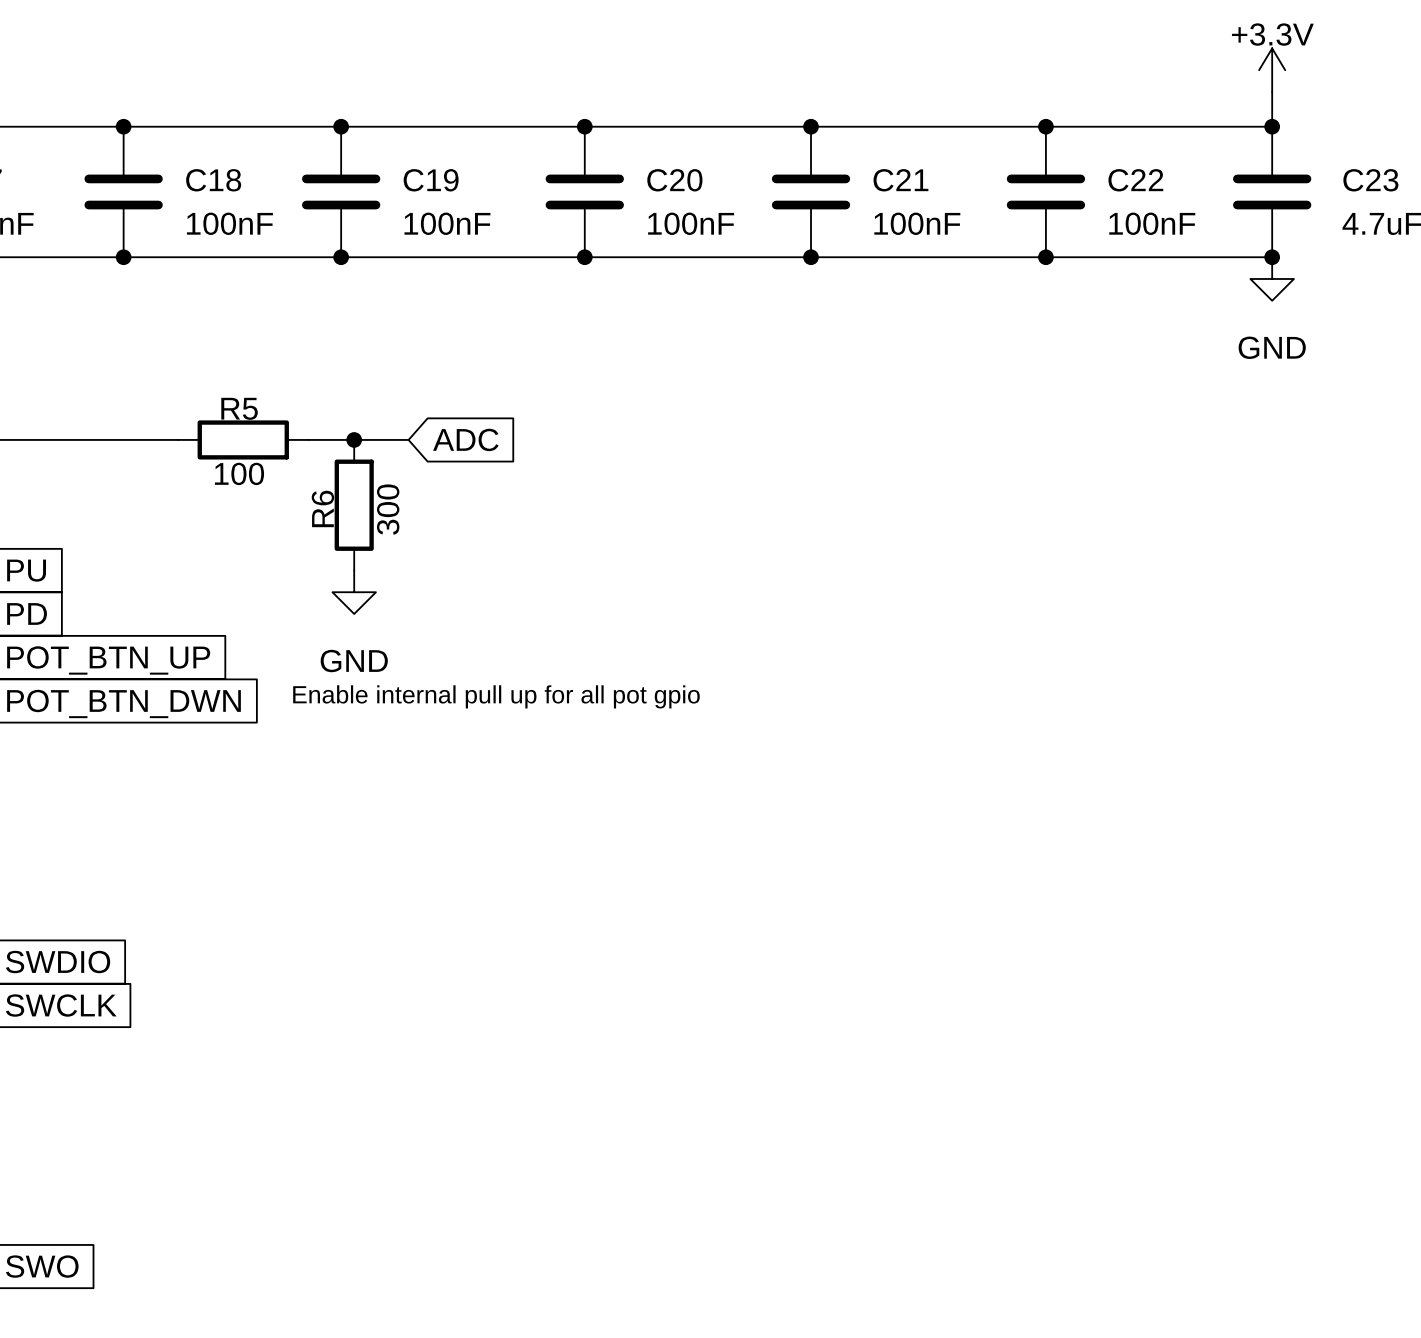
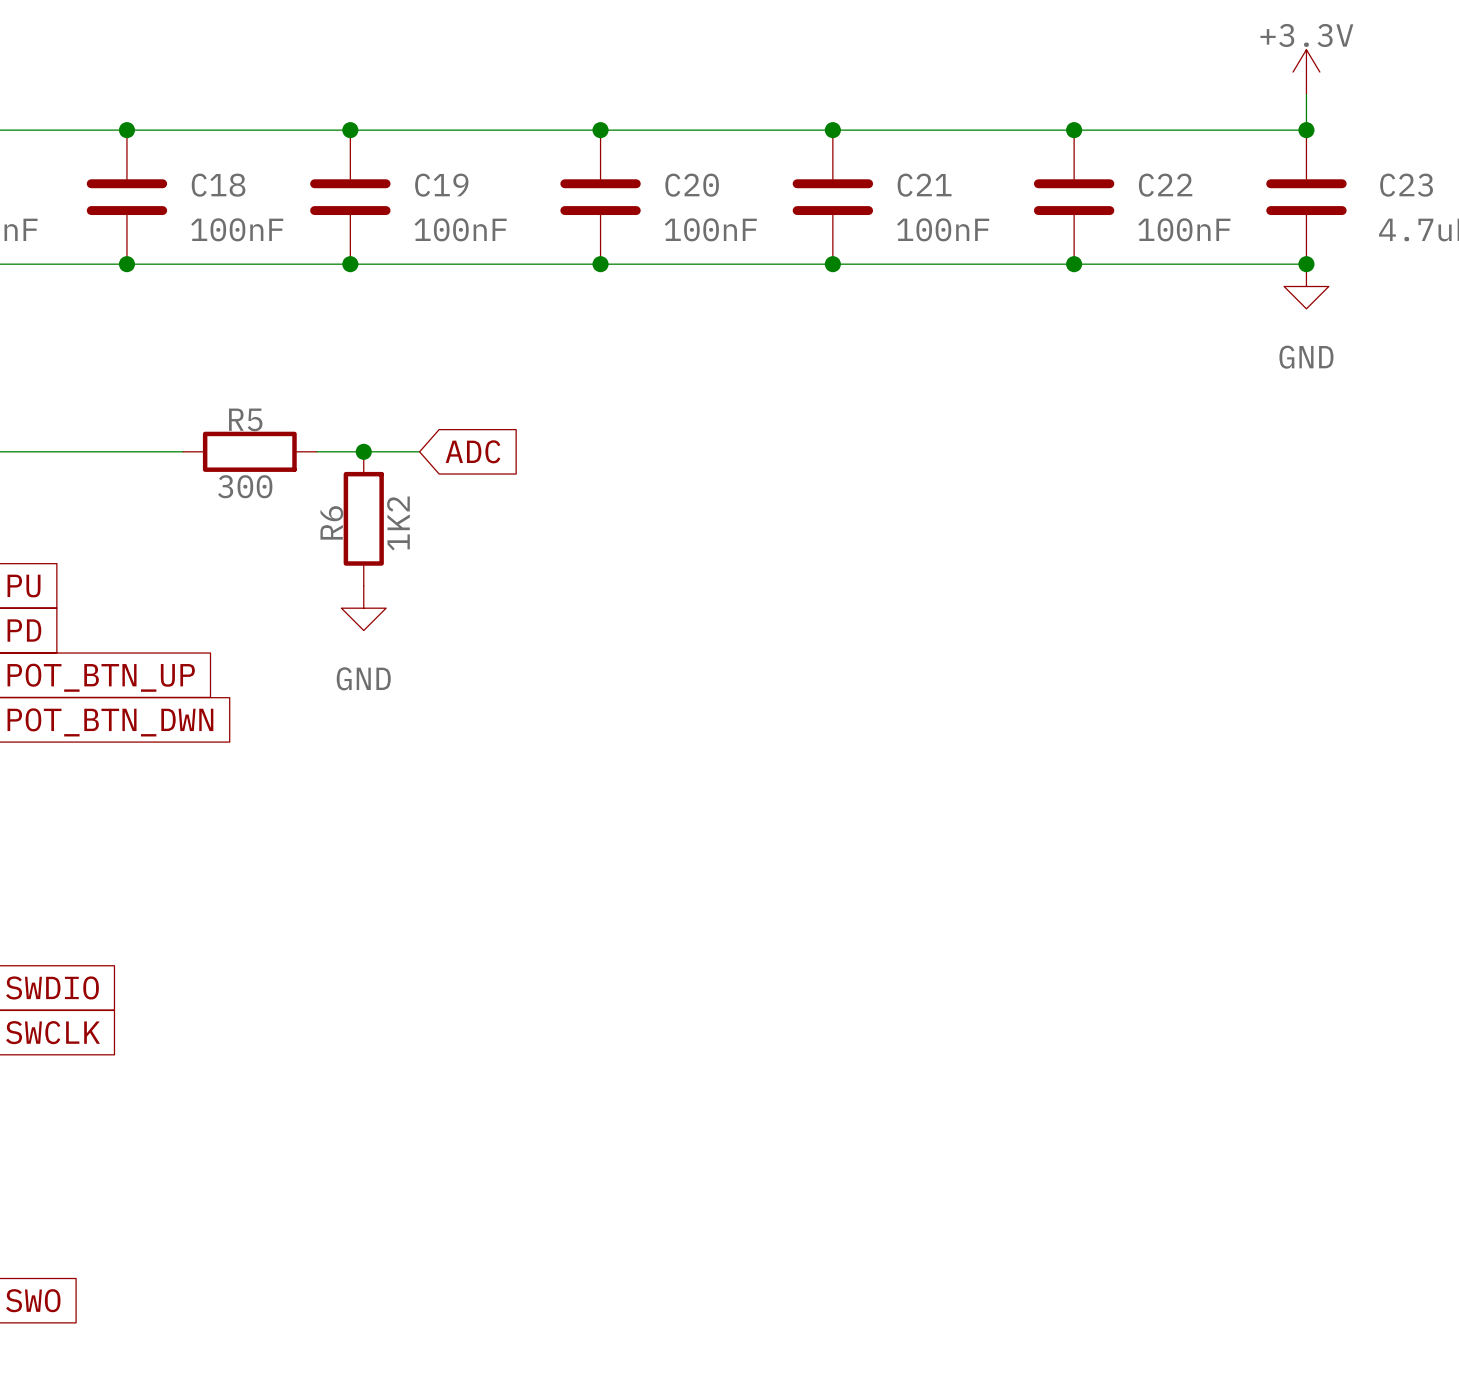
R5 value: 100 (239, 473) -> 300 (245, 486)
R6 value: 300 (388, 509) -> 1K2 (398, 523)
text: Enable internal pull up for all pot gpio (496, 696) -> none

